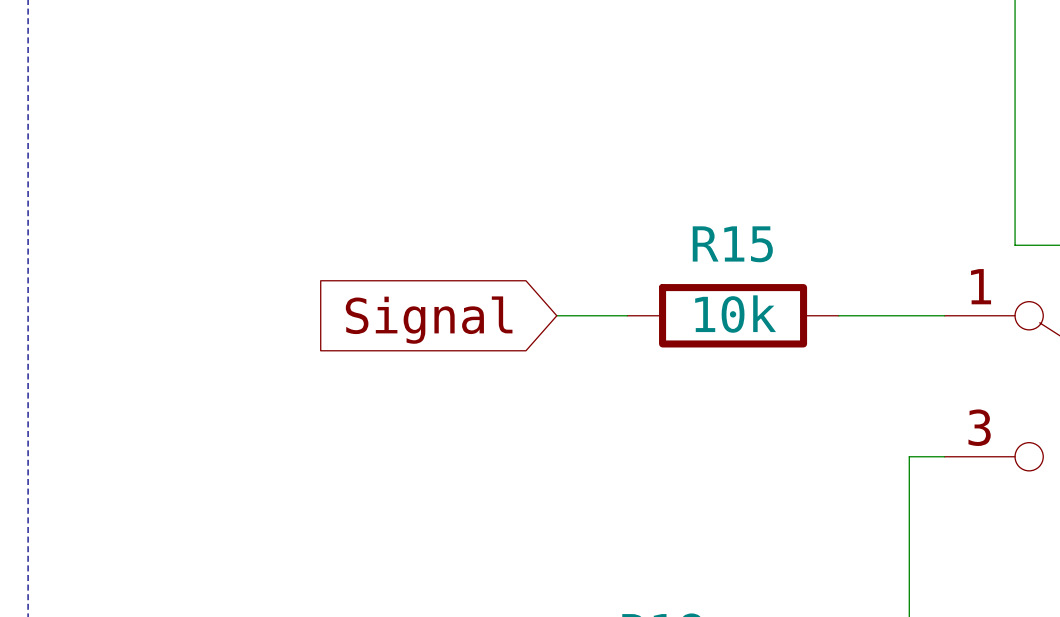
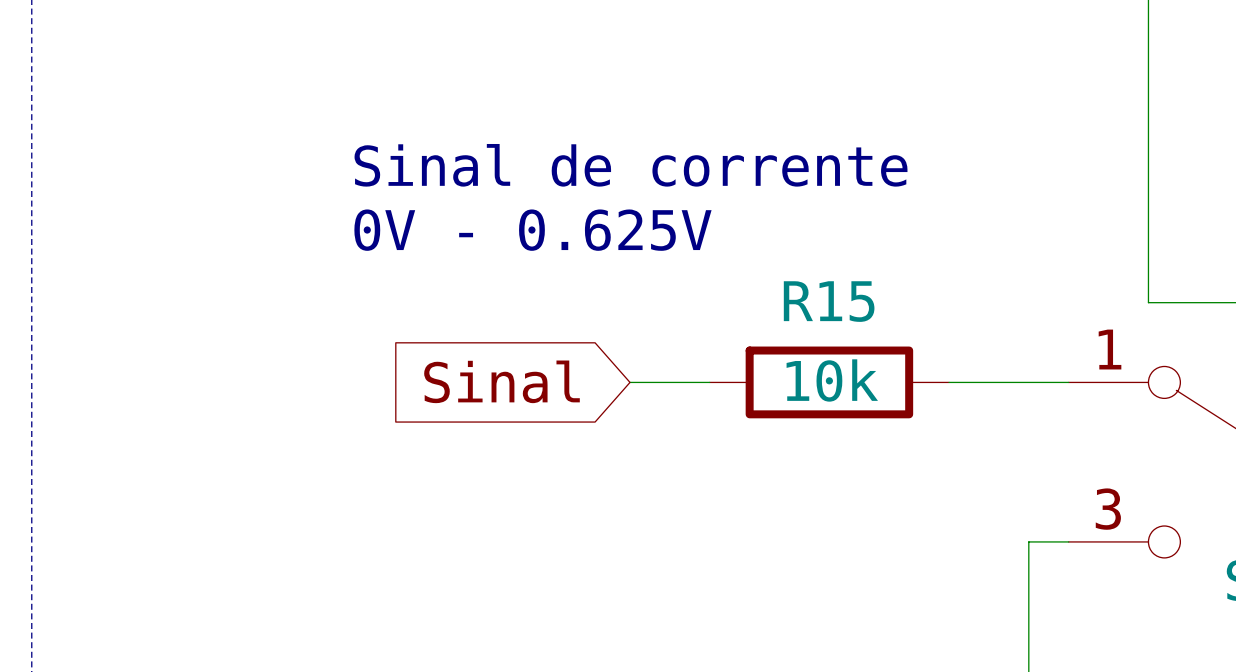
text: none -> Sinal de corrente (631, 165)
text: none -> 0V - 0.625V (532, 230)
global label: Signal (429, 320) -> Sinal (501, 381)

